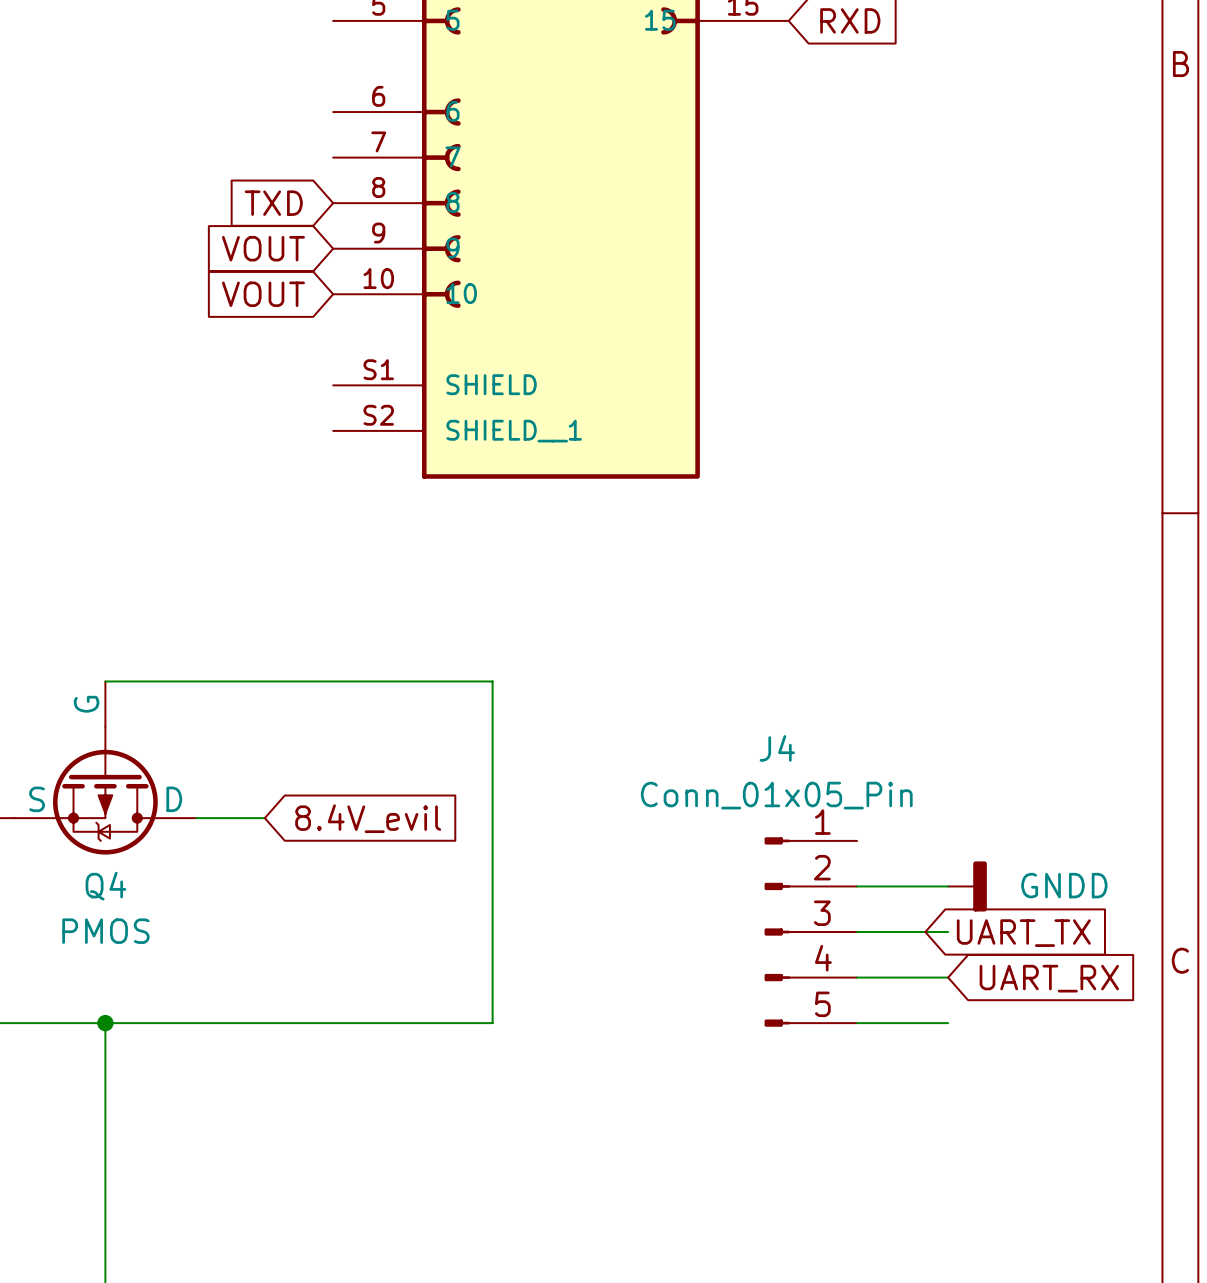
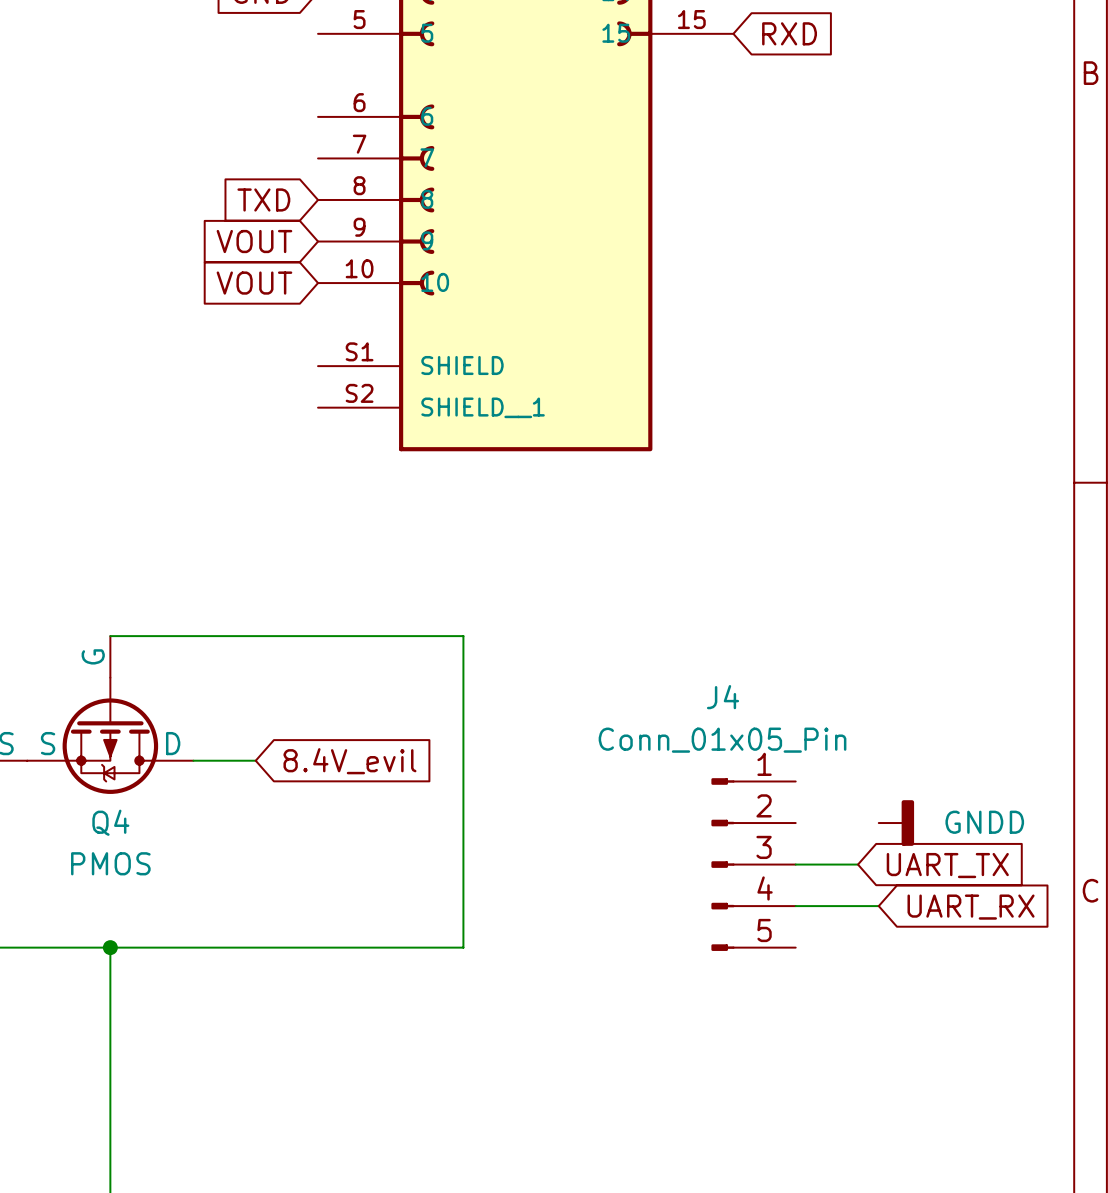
wire: (857, 886) (948, 886) -> none
wire: (925, 932) (948, 932) -> none
wire: (857, 1023) (948, 1023) -> none

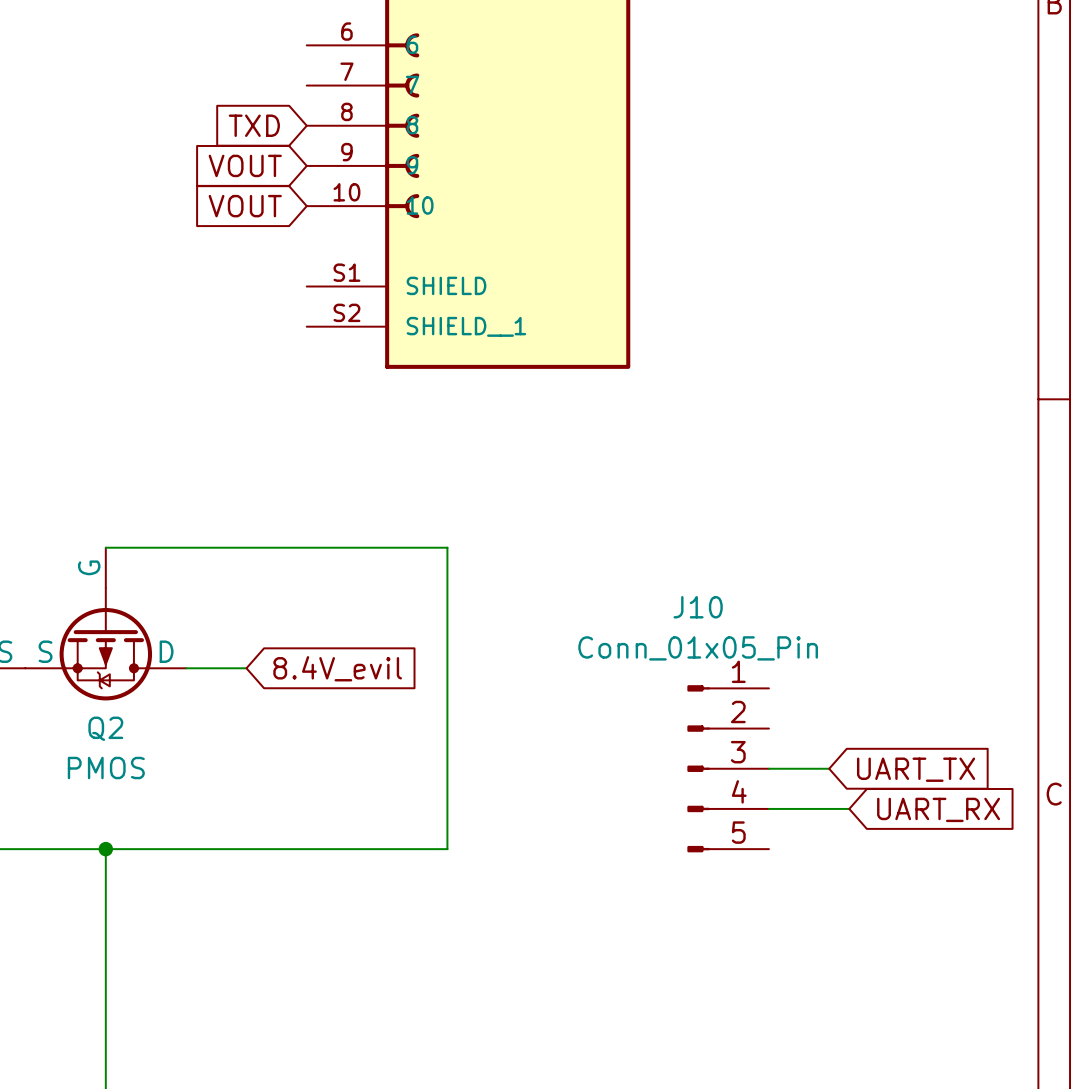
J4 name: J4 (723, 697) -> J10 (698, 607)
Q4 name: Q4 (110, 822) -> Q2 (105, 728)
power symbol: GNDD (896, 823) -> none

